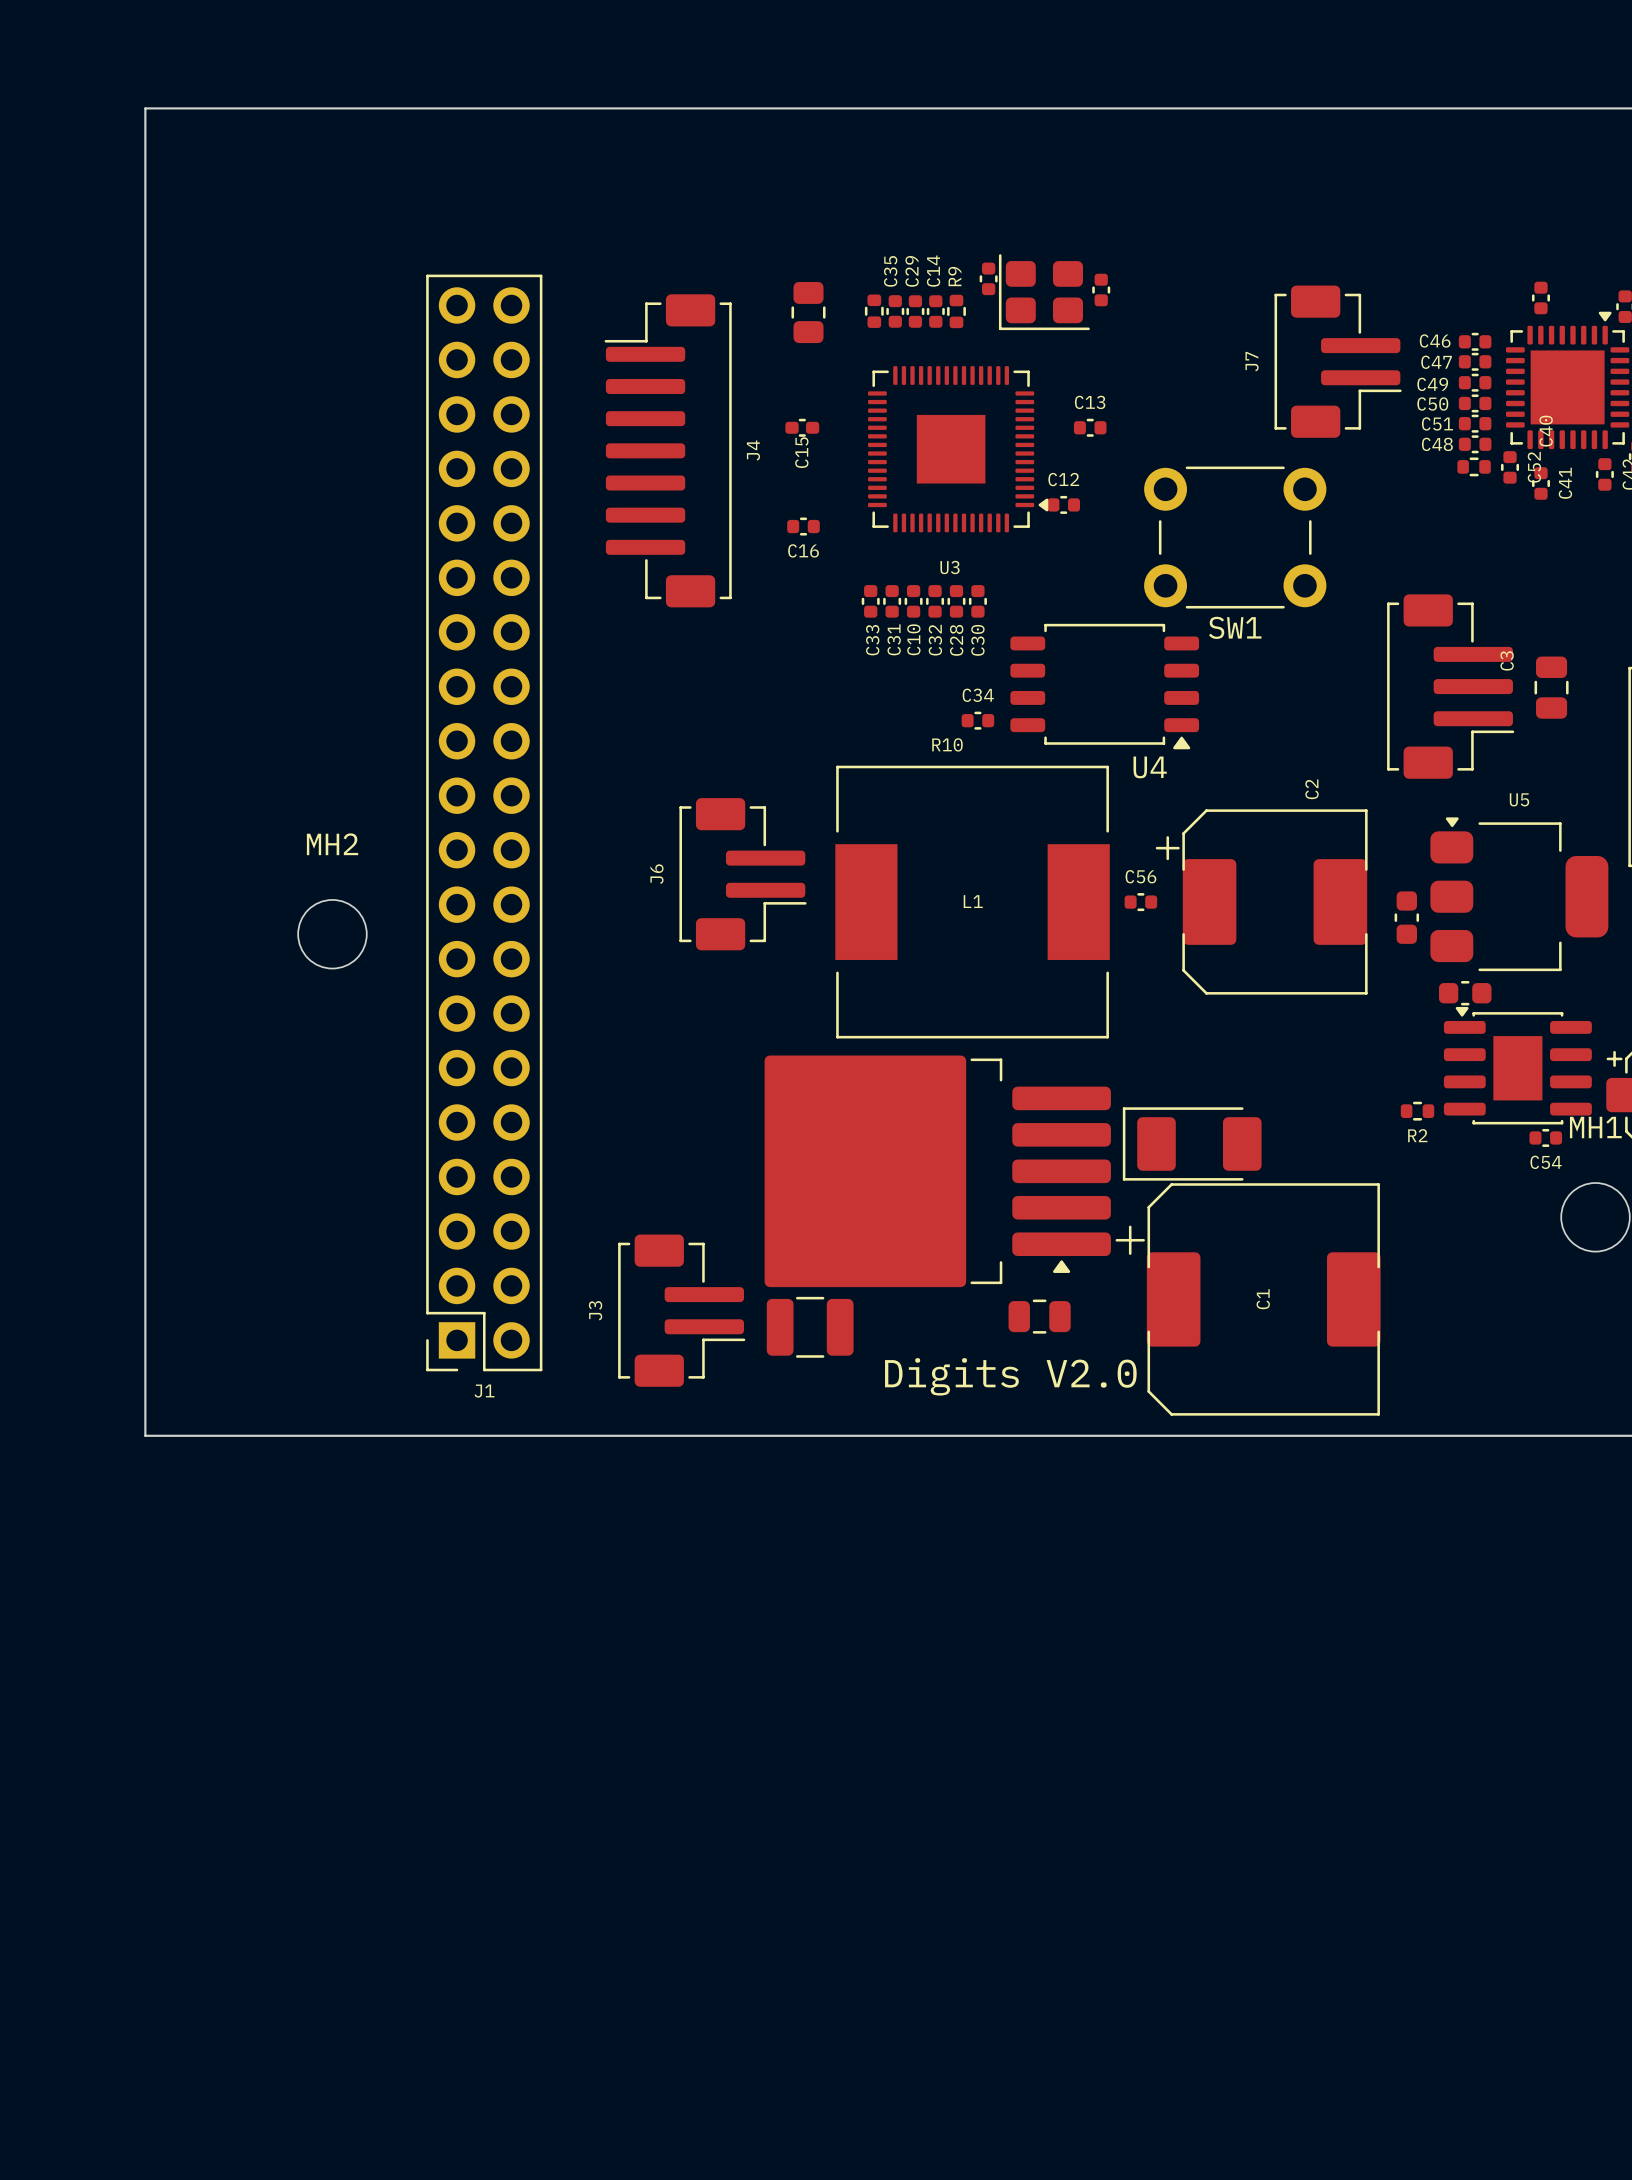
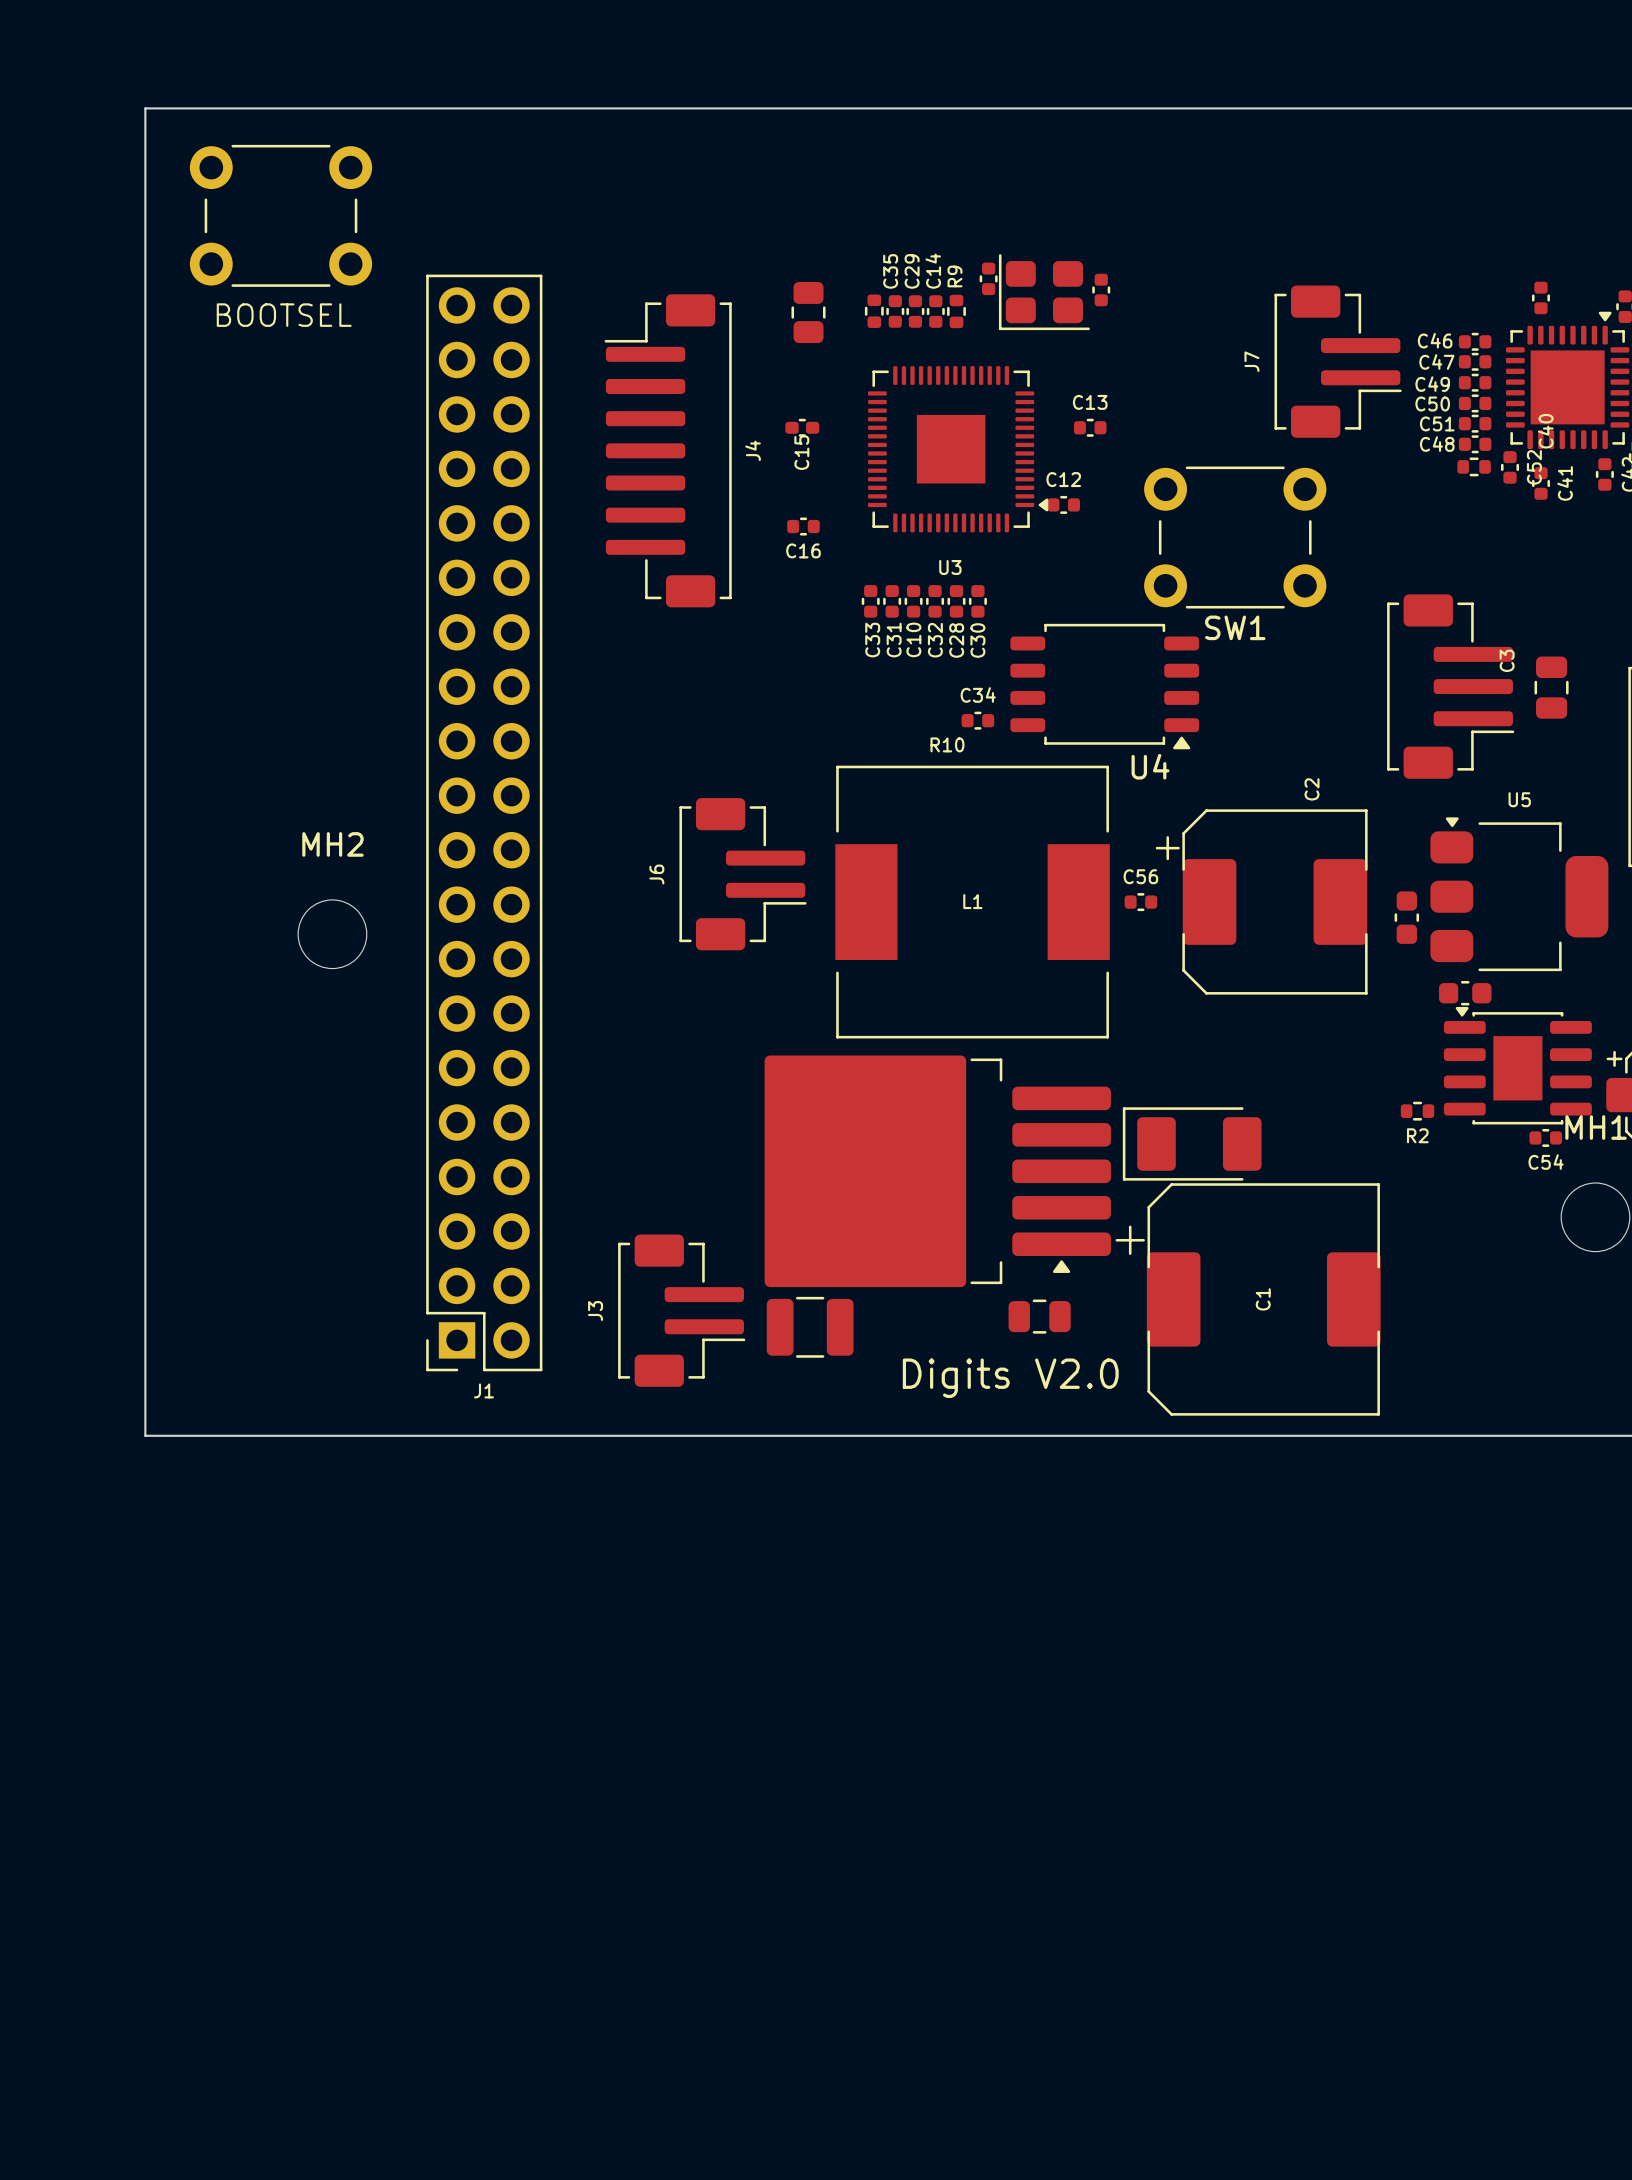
part: none -> (280, 215)
text: none -> BOOTSEL (284, 315)

